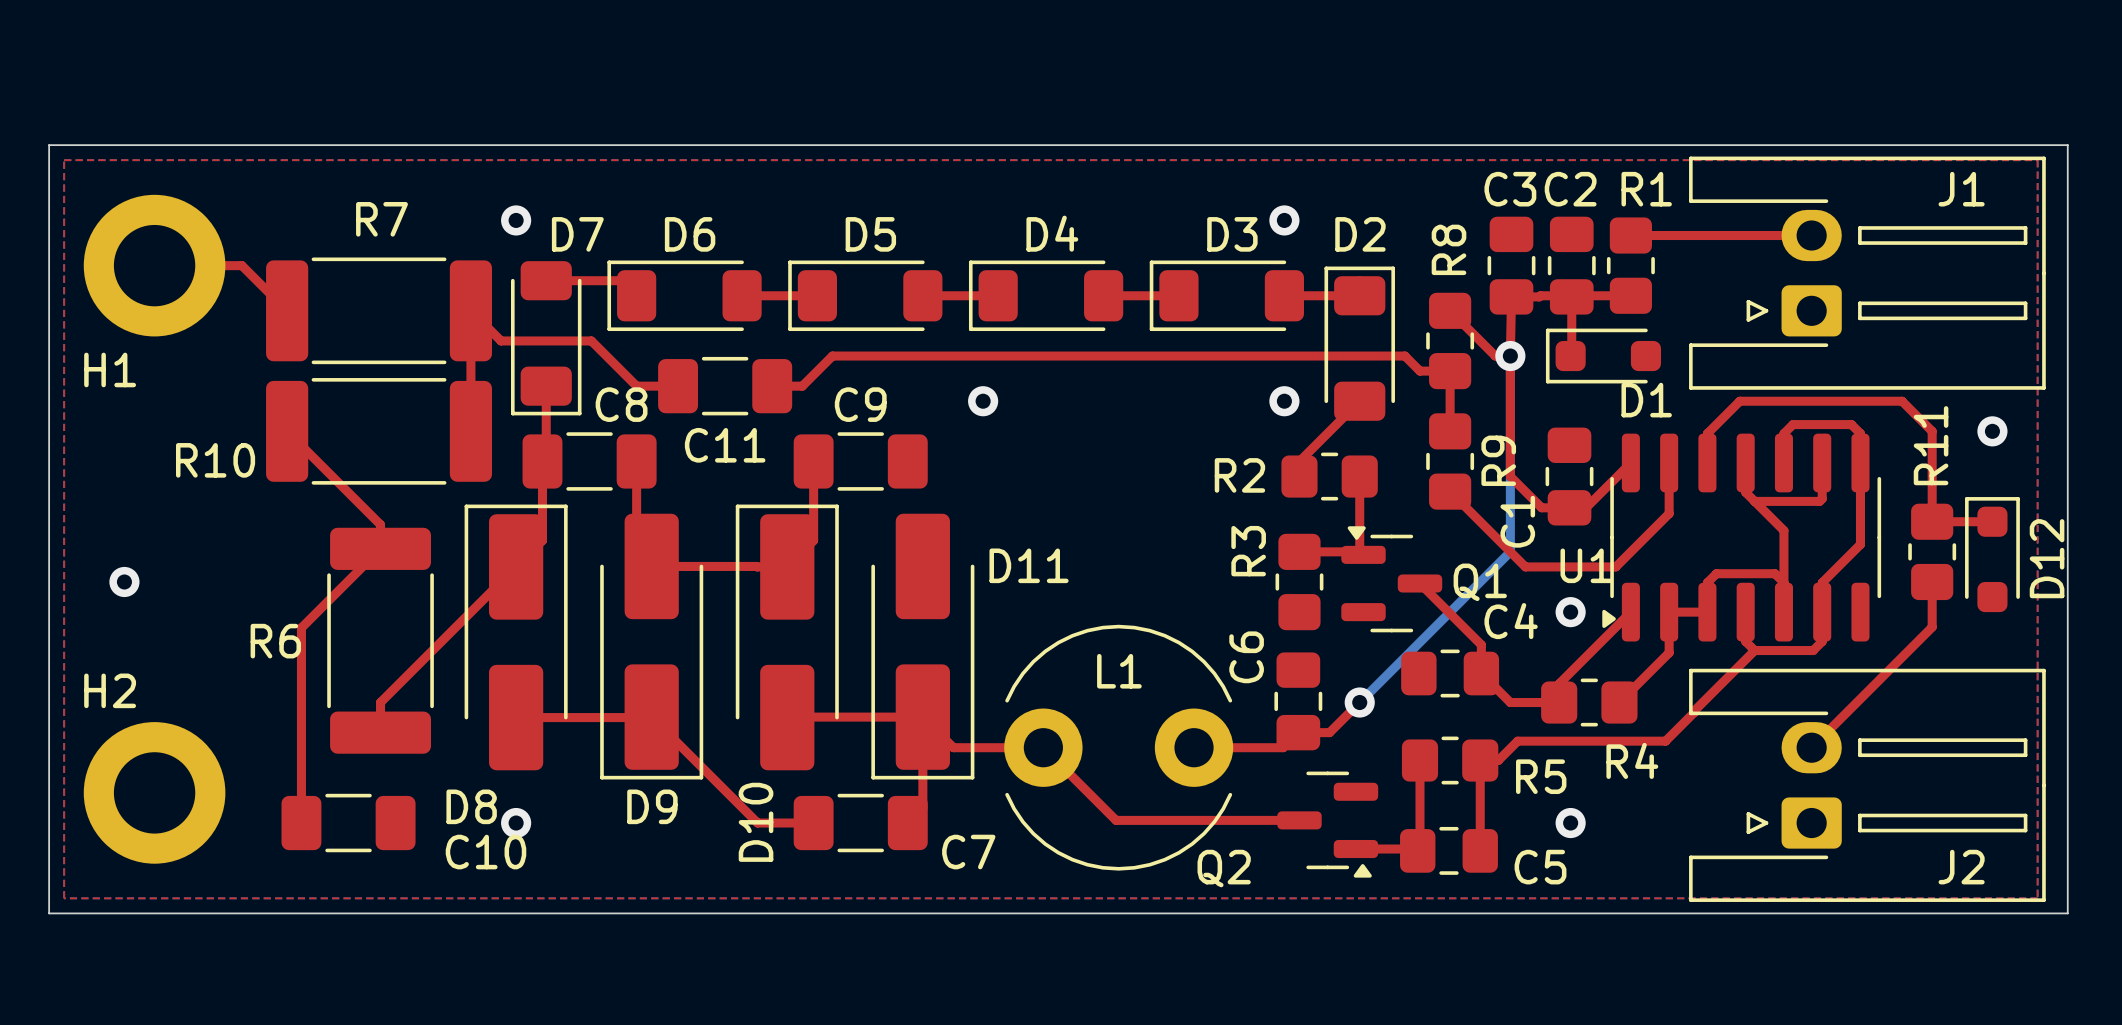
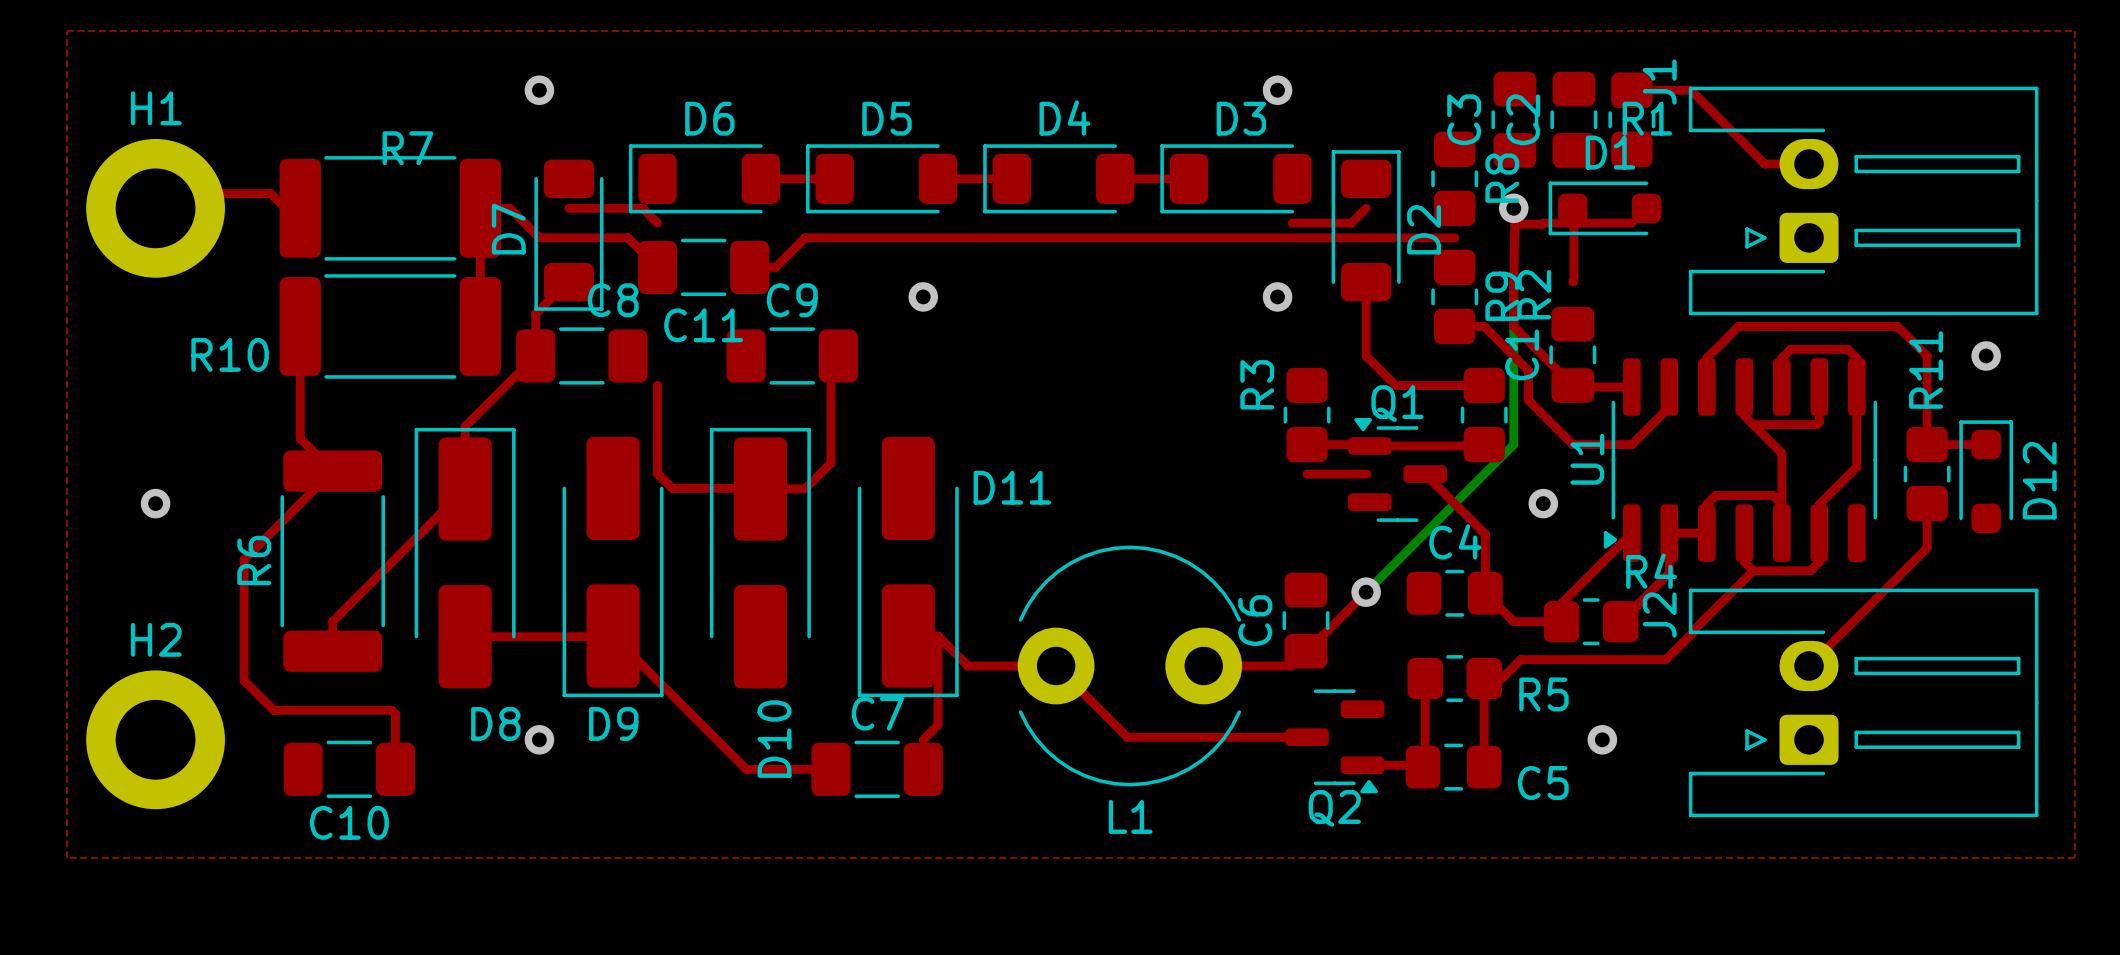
board edge: (49, 145) (2067, 145) (2067, 913) (49, 913) (49, 145) -> none
top zone outline: (64, 160) (64, 898) (2037, 898) (2037, 160) (64, 160) -> (67, 31) (67, 857) (2074, 857) (2074, 31) (67, 31)
C3 name rotation: 0° (1510, 189) -> 90° counterclockwise (1464, 119)
C2 name rotation: 0° (1570, 189) -> 90° counterclockwise (1523, 119)
J1 name rotation: 0° (1961, 189) -> 90° counterclockwise (1659, 82)
J1 name position: J1 (1961, 189) -> J1 (1659, 82)
via position: (516, 220) -> (539, 90)
via position: (1284, 220) -> (1277, 90)
D7 name rotation: 0° (577, 234) -> 90° counterclockwise (508, 229)
D7 name position: D7 (577, 234) -> D7 (508, 229)
D2 name rotation: 0° (1360, 234) -> 90° counterclockwise (1424, 229)
D2 name position: D2 (1360, 234) -> D2 (1424, 229)
top track: (1630, 235) (1766, 235) -> (1631, 90) (1690, 90) (1764, 164)
R8 name position: R8 (1448, 249) -> R8 (1502, 178)
H1 position: (154, 265) -> (155, 208)
C3 position: (1511, 265) -> (1514, 119)
C2 position: (1571, 265) -> (1573, 119)
R1 position: (1630, 265) -> (1631, 119)
D6 position: (684, 295) -> (704, 178)
top track: (742, 295) (817, 295) -> (760, 178) (834, 178)
D5 position: (865, 295) -> (881, 178)
top track: (922, 295) (998, 295) -> (938, 178) (1011, 178)
D4 position: (1046, 295) -> (1058, 178)
top track: (1103, 295) (1178, 295) -> (1115, 178) (1188, 178)
D3 position: (1226, 295) -> (1235, 178)
R10 position: (379, 310) -> (390, 208)
top track: (1450, 310) (1495, 356) (1511, 354) -> (1454, 237) (805, 237) (775, 267) (749, 267)
D7 position: (546, 338) -> (568, 235)
top track: none -> (657, 267) (627, 237) (539, 237) (509, 208) (480, 208) (480, 326)
R8 position: (1450, 340) -> (1454, 178)
D2 position: (1359, 343) -> (1366, 225)
top track: (1359, 356) (832, 356) (802, 386) (772, 386) -> (1366, 282) (1366, 355) (1395, 385) (1484, 385)
top track: (1374, 356) (1404, 356) (1419, 371) (1450, 371) (1450, 431) -> none
via position: (1510, 356) -> (1513, 208)
D1 position: (1603, 356) -> (1605, 208)
top track: none -> (560, 288) (535, 313) (535, 355) (465, 426) (465, 489) (332, 621) (332, 651)
H1 name position: H1 (110, 369) -> H1 (156, 108)
top track: (546, 386) (546, 457) (542, 461) (542, 540) (380, 702) (380, 732) -> none
top track: (678, 386) (636, 386) (591, 340) (501, 340) (470, 310) (470, 431) -> none
C11 position: (725, 386) -> (703, 267)
D1 name position: D1 (1646, 400) -> D1 (1610, 152)
top track: none -> (300, 326) (300, 438) (332, 471) (244, 559) (244, 680) (273, 710) (391, 710) (395, 713) (395, 769)
via position: (983, 401) -> (923, 296)
via position: (1284, 401) -> (1277, 296)
top track: (1359, 401) (1299, 461) (1299, 476) -> none
top track: (1510, 401) (1510, 476) (1541, 507) (1586, 507) (1630, 462) -> (1513, 326) (1574, 386) (1631, 386)
top track: (287, 431) (380, 524) (380, 548) (301, 627) (301, 823) -> none
R7 position: (379, 431) -> (390, 326)
C8 position: (589, 461) -> (581, 355)
C9 position: (860, 461) -> (792, 355)
R9 position: (1450, 461) -> (1454, 296)
R2 name position: R2 (1239, 475) -> R2 (1534, 294)
R2 rotation: 0° (1329, 476) -> 90° clockwise (1484, 415)
R2 position: (1329, 476) -> (1484, 415)
top track: (1359, 476) (1359, 551) (1363, 554) -> none
C1 position: (1569, 476) -> (1572, 354)
top track: (1669, 483) (1669, 513) (1615, 566) (1525, 566) (1450, 491) -> (1669, 407) (1631, 444) (1572, 444) (1528, 400) (1528, 370) (1484, 326) (1454, 326)
top track: none -> (1307, 444) (1484, 444)
bottom track: (1510, 521) (1510, 551) (1359, 702) -> (1513, 444) (1366, 592)
C1 name position: C1 (1517, 521) -> C1 (1522, 354)
U1 name rotation: 0° (1586, 565) -> 90° counterclockwise (1587, 459)
Q1 position: (1391, 579) -> (1397, 469)
R3 position: (1299, 581) -> (1307, 415)
Q1 name position: Q1 (1480, 582) -> Q1 (1397, 403)
top track: (1419, 583) (1481, 644) -> (1425, 474) (1485, 534) (1485, 565)
via position: (1570, 612) -> (1543, 503)
C4 name position: C4 (1511, 621) -> C4 (1455, 541)
D8 position: (516, 637) -> (465, 558)
D10 position: (787, 637) -> (760, 558)
R6 position: (380, 640) -> (332, 561)
R6 name rotation: 0° (275, 641) -> 90° counterclockwise (254, 560)
D9 position: (651, 646) -> (613, 566)
D11 position: (922, 646) -> (908, 566)
C6 name position: C6 (1246, 657) -> C6 (1255, 620)
L1 name position: L1 (1119, 671) -> L1 (1130, 816)
H2 name position: H2 (110, 690) -> H2 (156, 639)
top track: (1359, 702) (1329, 732) (1299, 732) -> (1366, 592) (1307, 651)
via position: (1359, 702) -> (1366, 592)
top track: (516, 717) (651, 717) (757, 823) (813, 823) -> none
top track: none -> (612, 636) (465, 636)
top track: none -> (613, 636) (746, 769) (830, 769)
top track: (922, 717) (787, 717) -> none
R4 name position: R4 (1632, 760) -> R4 (1651, 571)
H2 position: (154, 792) -> (155, 739)
C10 position: (348, 823) -> (349, 769)
C7 position: (860, 823) -> (877, 769)
via position: (1570, 823) -> (1602, 739)
C10 name position: C10 (485, 852) -> C10 (349, 822)
C7 name position: C7 (968, 852) -> C7 (877, 713)
J2 name rotation: 0° (1961, 867) -> 90° counterclockwise (1659, 615)
J2 name position: J2 (1961, 867) -> J2 (1659, 615)
Q2 name position: Q2 (1224, 868) -> Q2 (1334, 808)

